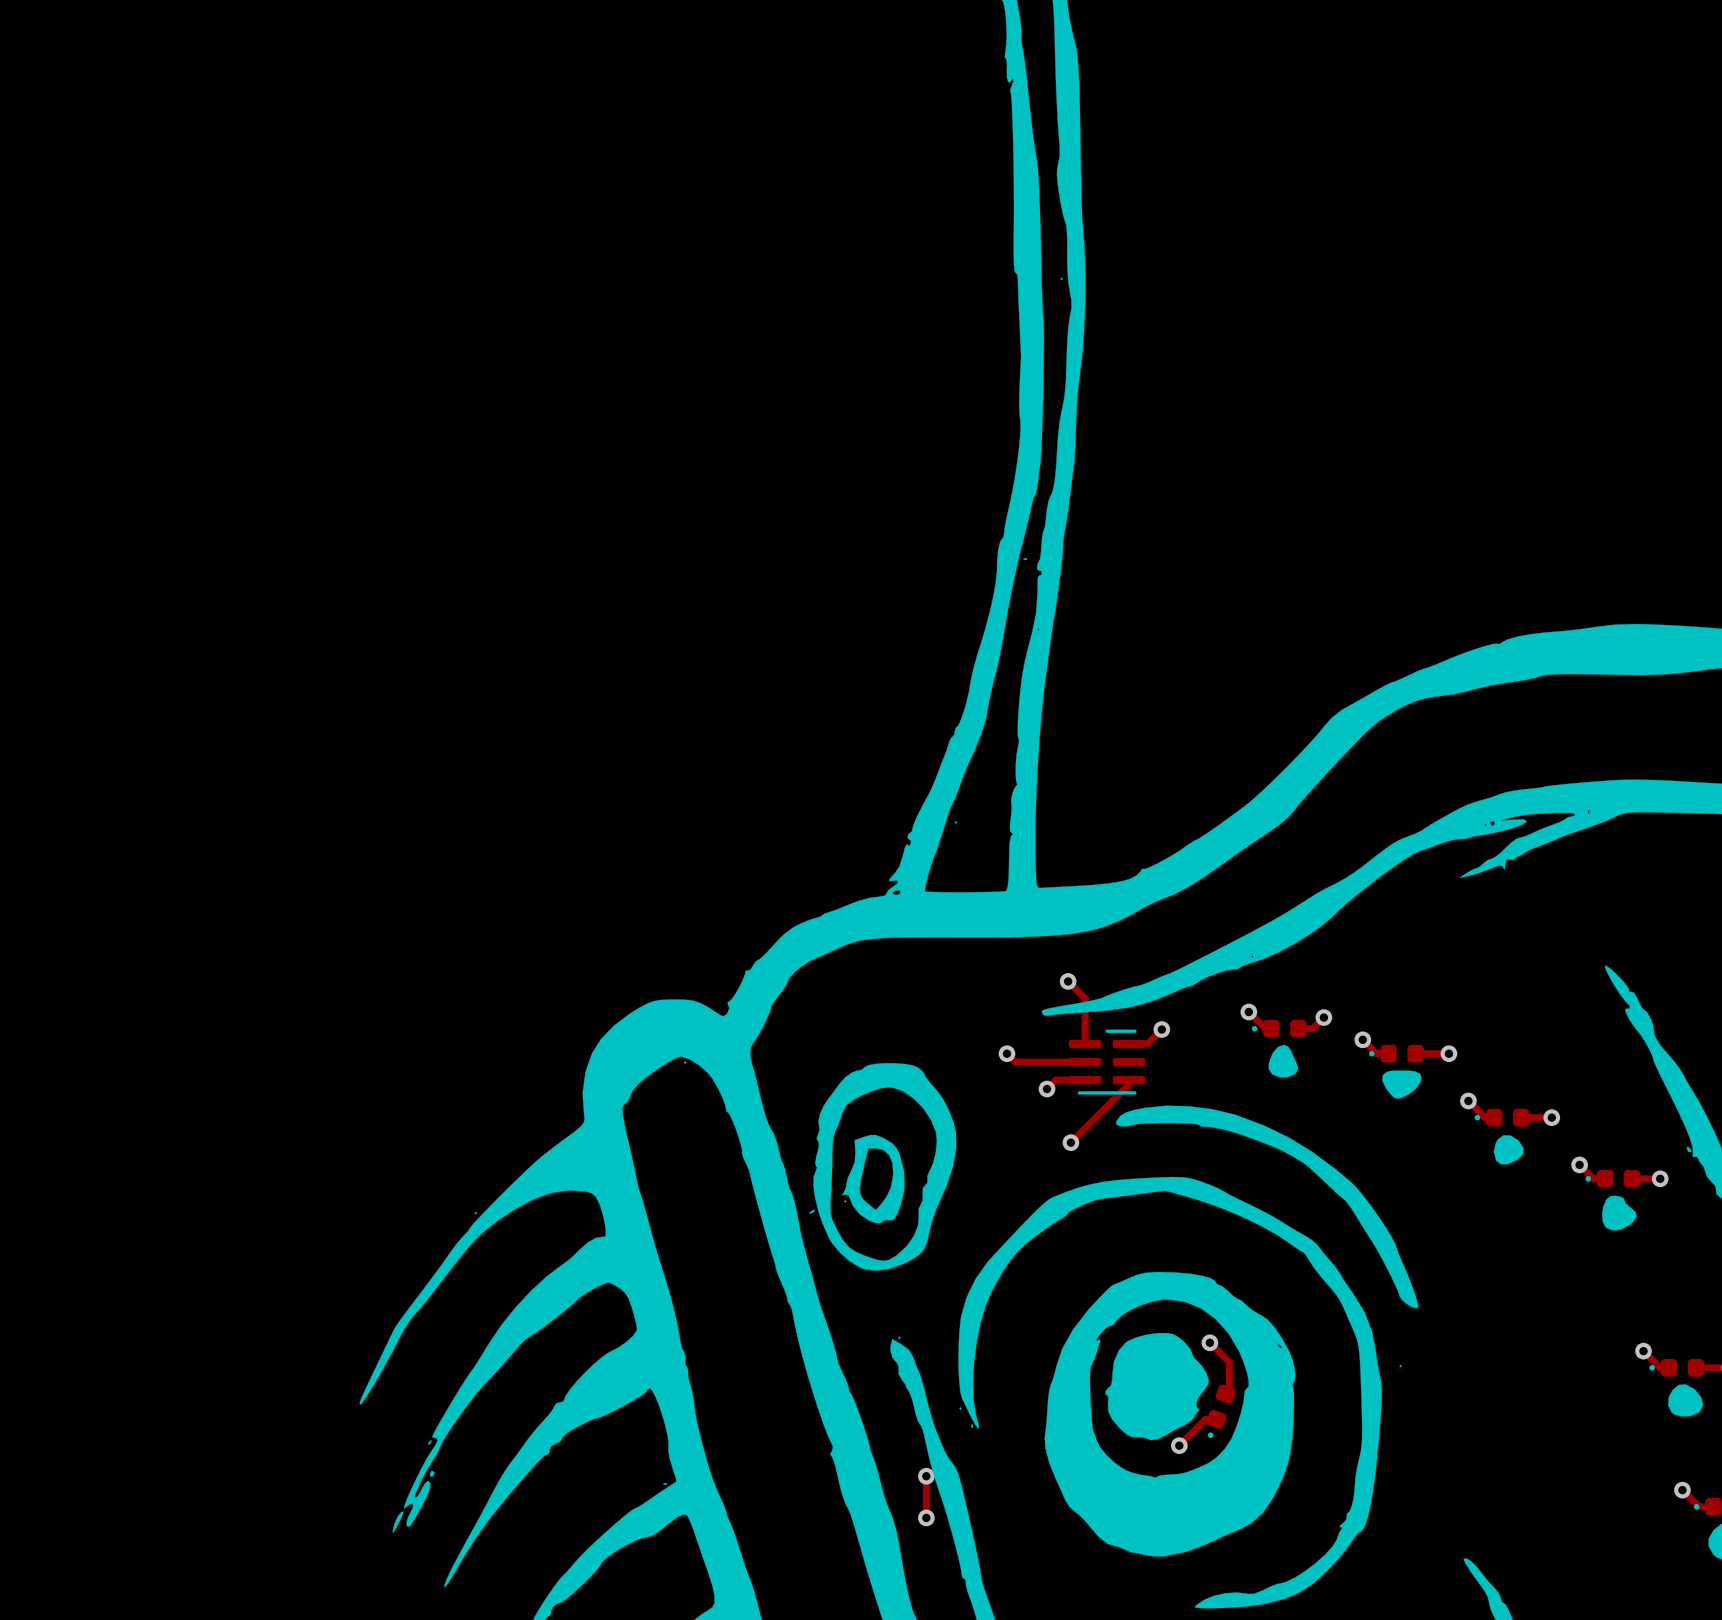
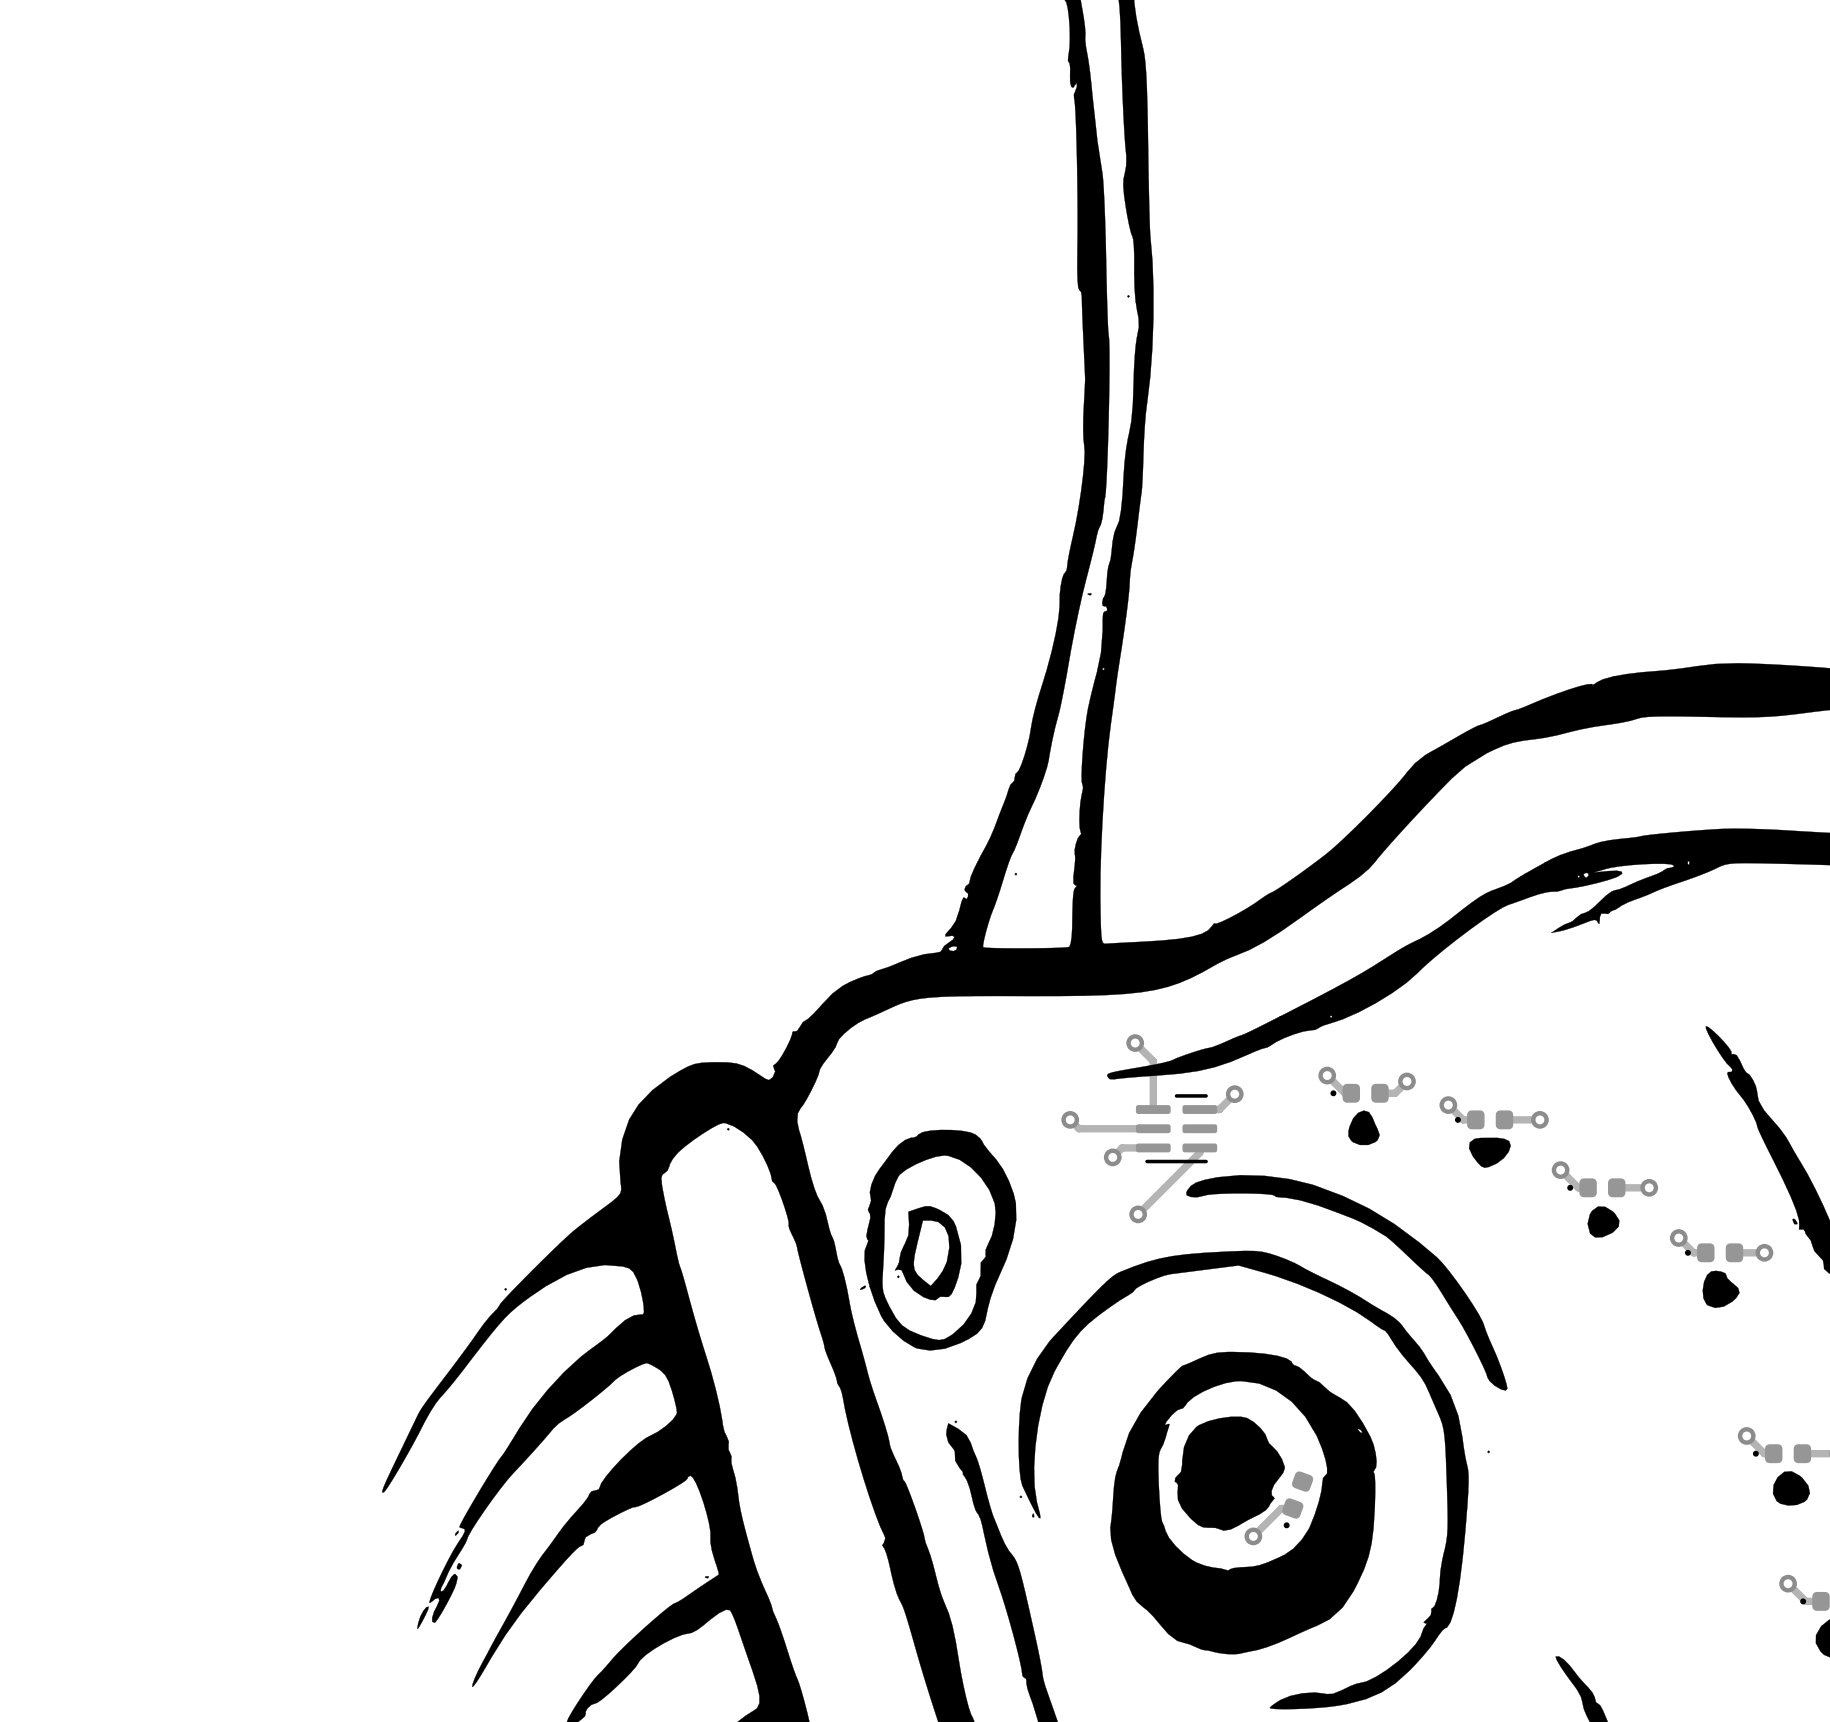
track: (1209, 1342) (1229, 1362) (1229, 1390) (1225, 1394) -> none
via: (1209, 1342) -> none
track: (926, 1476) (926, 1517) -> none
via: (926, 1476) -> none
via: (926, 1517) -> none

